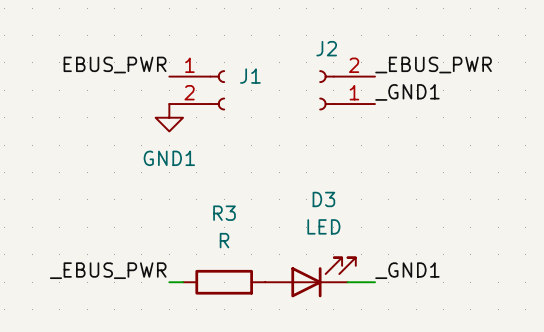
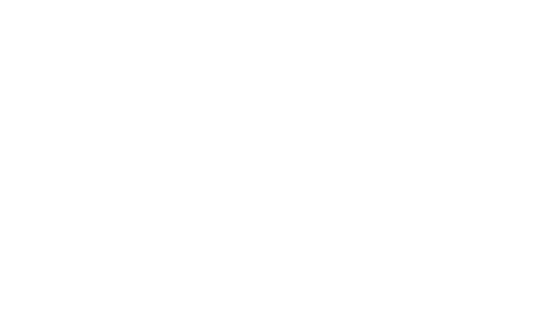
label: EBUS_PWR (115, 65) -> none
label: _EBUS_PWR (433, 65) -> none
J1: (197, 90) -> none
J2: (347, 90) -> none
label: _GND1 (407, 92) -> none
power symbol: GND1 (169, 117) -> none
label: _EBUS_PWR (108, 270) -> none
label: _GND1 (407, 270) -> none
D3: LED (310, 277) -> none
wire: (169, 282) (183, 282) -> none
R3: R (224, 282) -> none
wire: (347, 282) (374, 282) -> none

